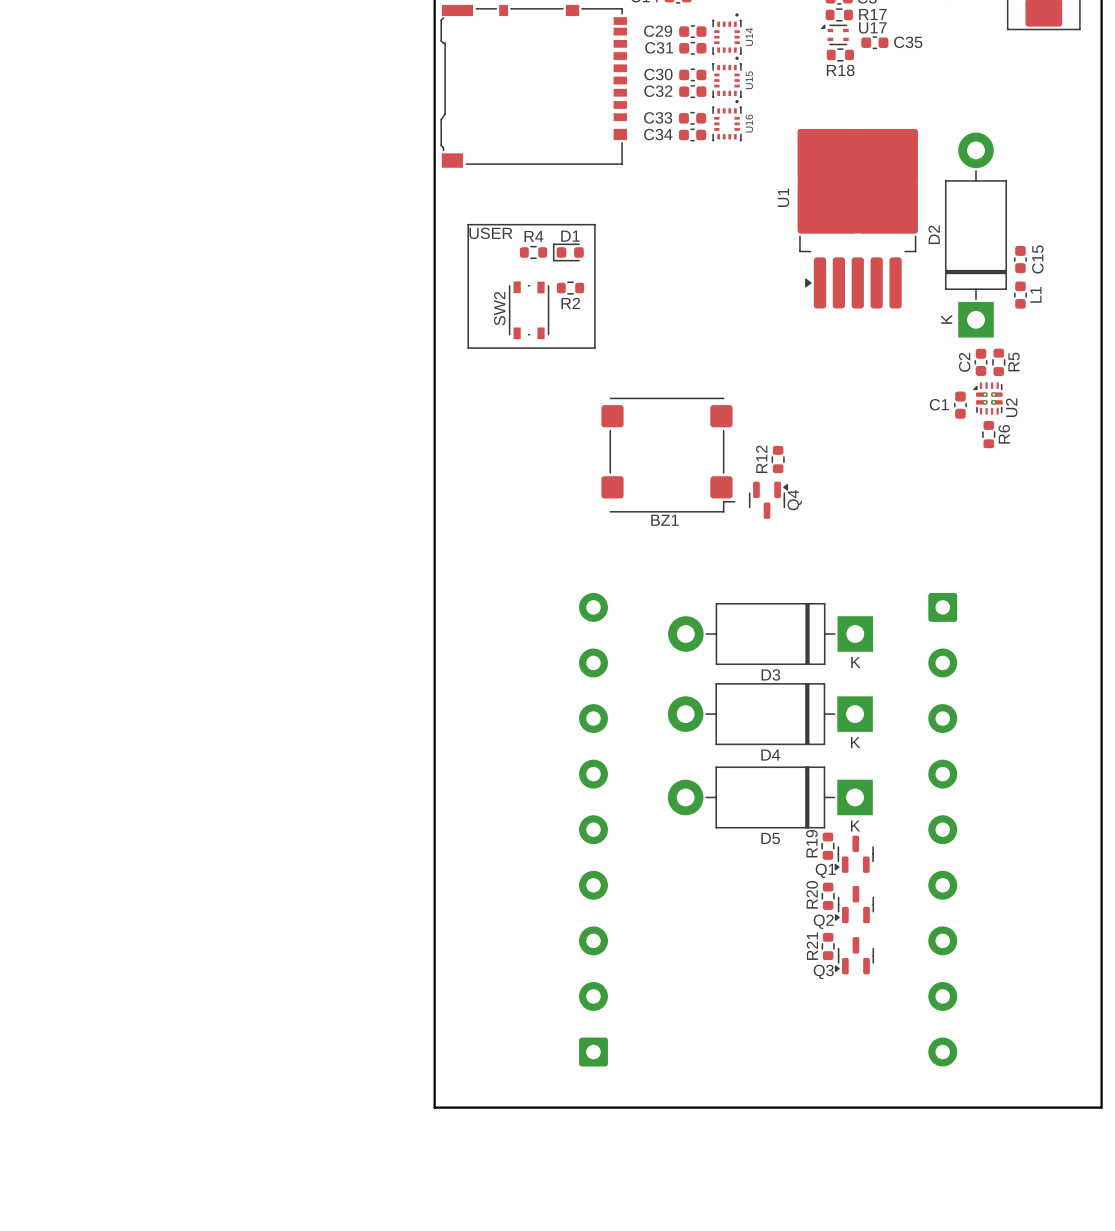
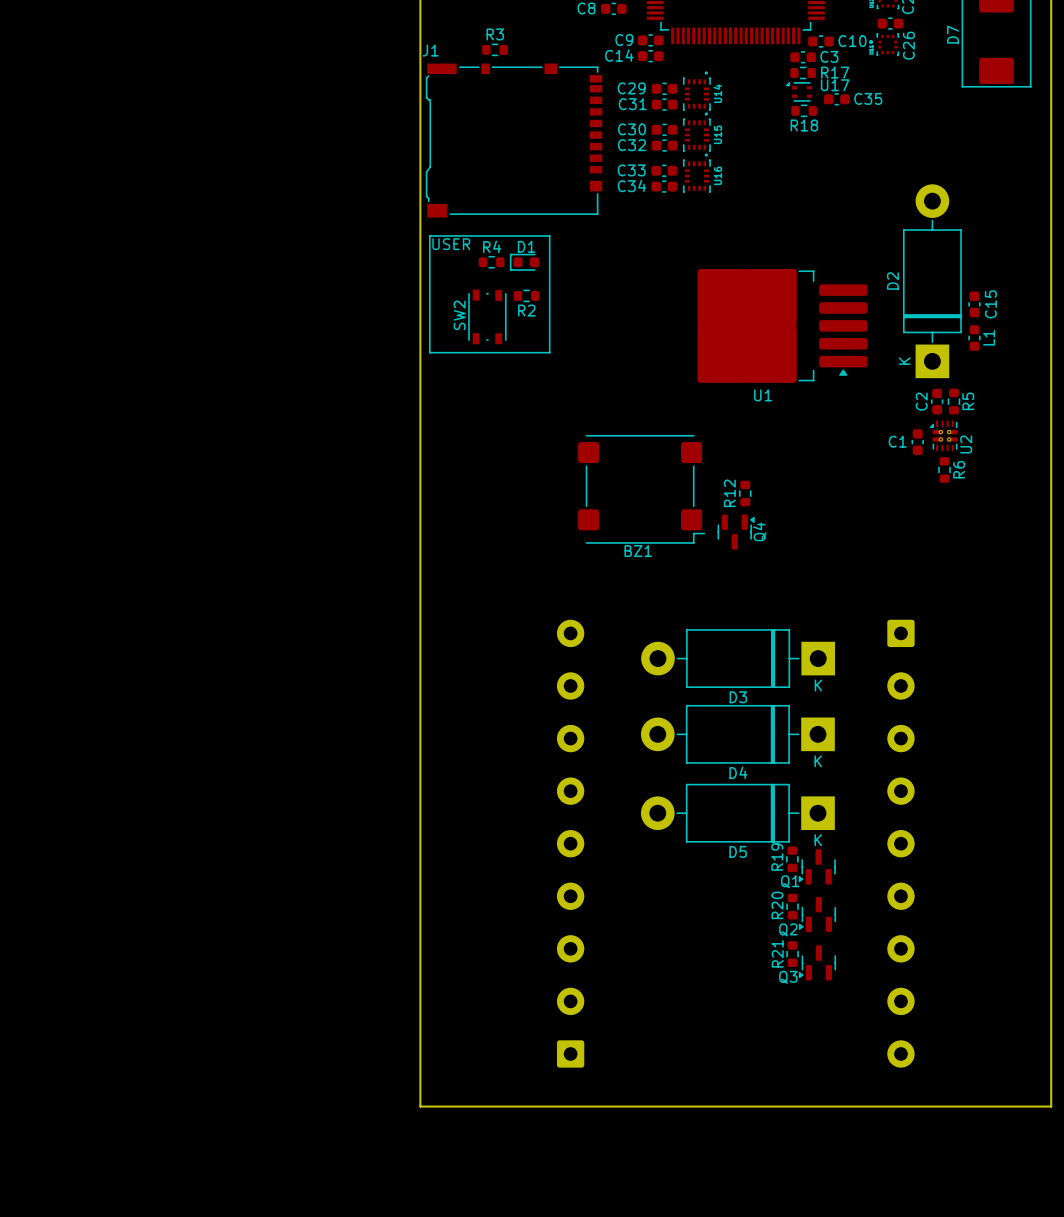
U1 rotation: 0° (857, 218) -> 90° counterclockwise (782, 325)
line: (468, 224) (594, 224) (594, 348) (468, 348) (468, 224) -> (429, 235) (549, 235) (549, 352) (429, 352) (429, 235)
text position: USER (490, 233) -> USER (451, 244)
R4 position: (533, 252) -> (491, 262)
D1 position: (568, 252) -> (524, 262)
R2 position: (570, 288) -> (526, 295)
SW2 position: (529, 310) -> (487, 316)

